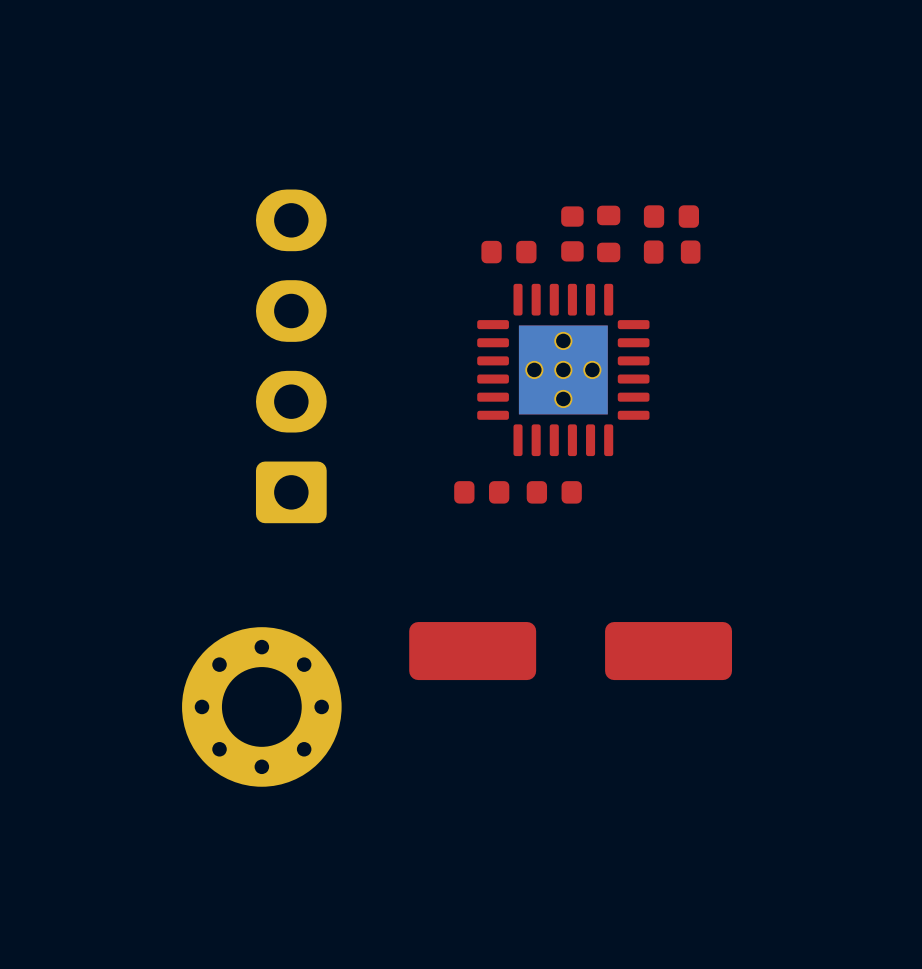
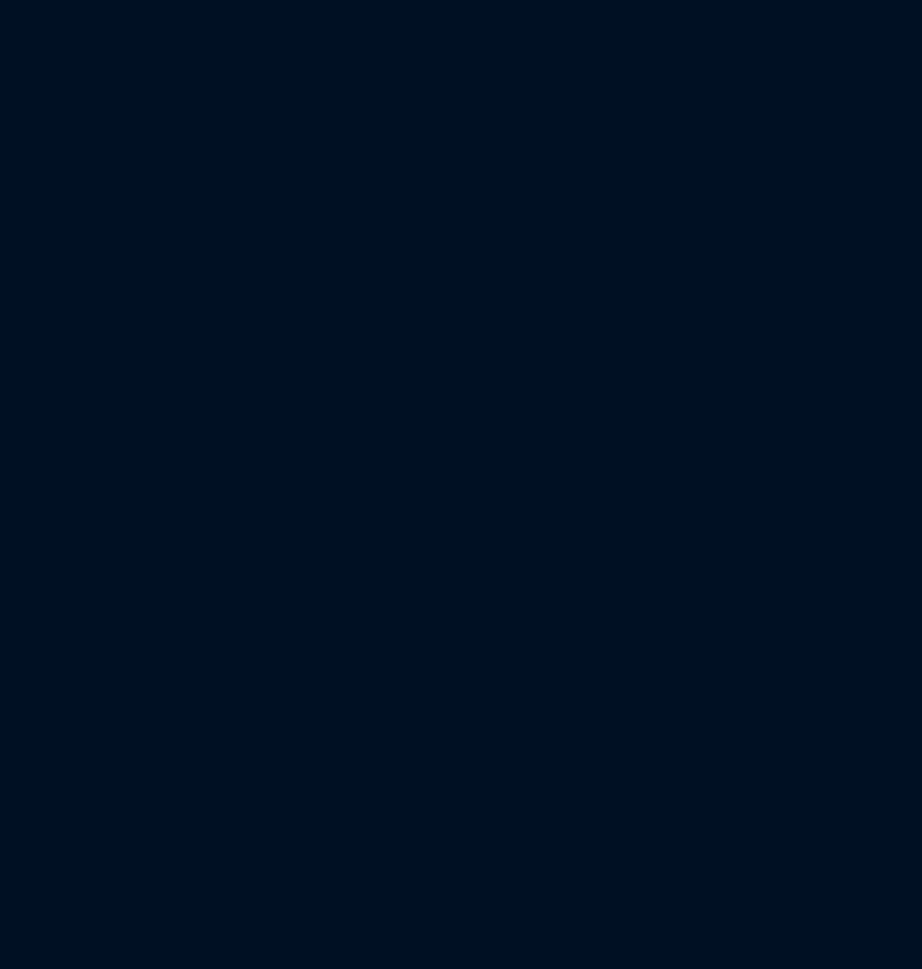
part: (671, 216) -> none
part: (572, 233) -> none
part: (608, 233) -> none
part: (508, 252) -> none
part: (672, 252) -> none
part: (291, 356) -> none
part: (563, 369) -> none
part: (481, 492) -> none
part: (554, 492) -> none
part: (570, 651) -> none
part: (261, 706) -> none

